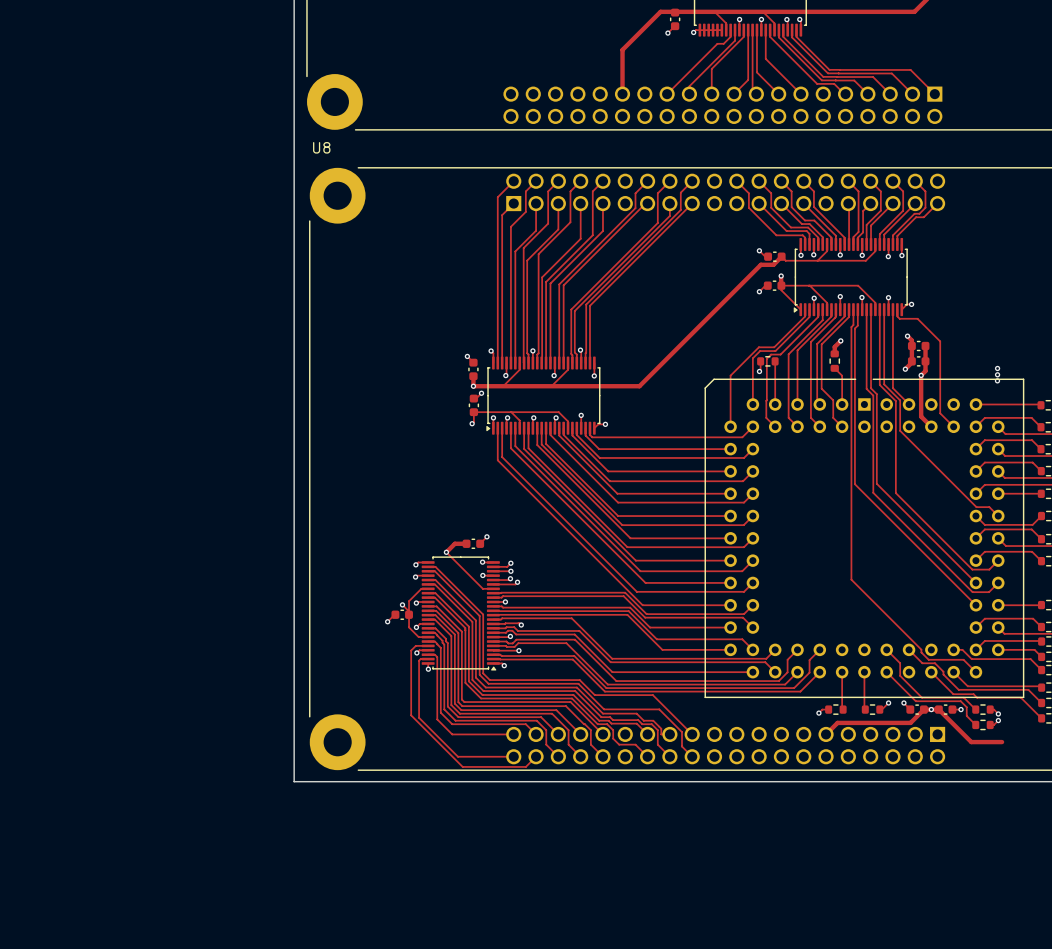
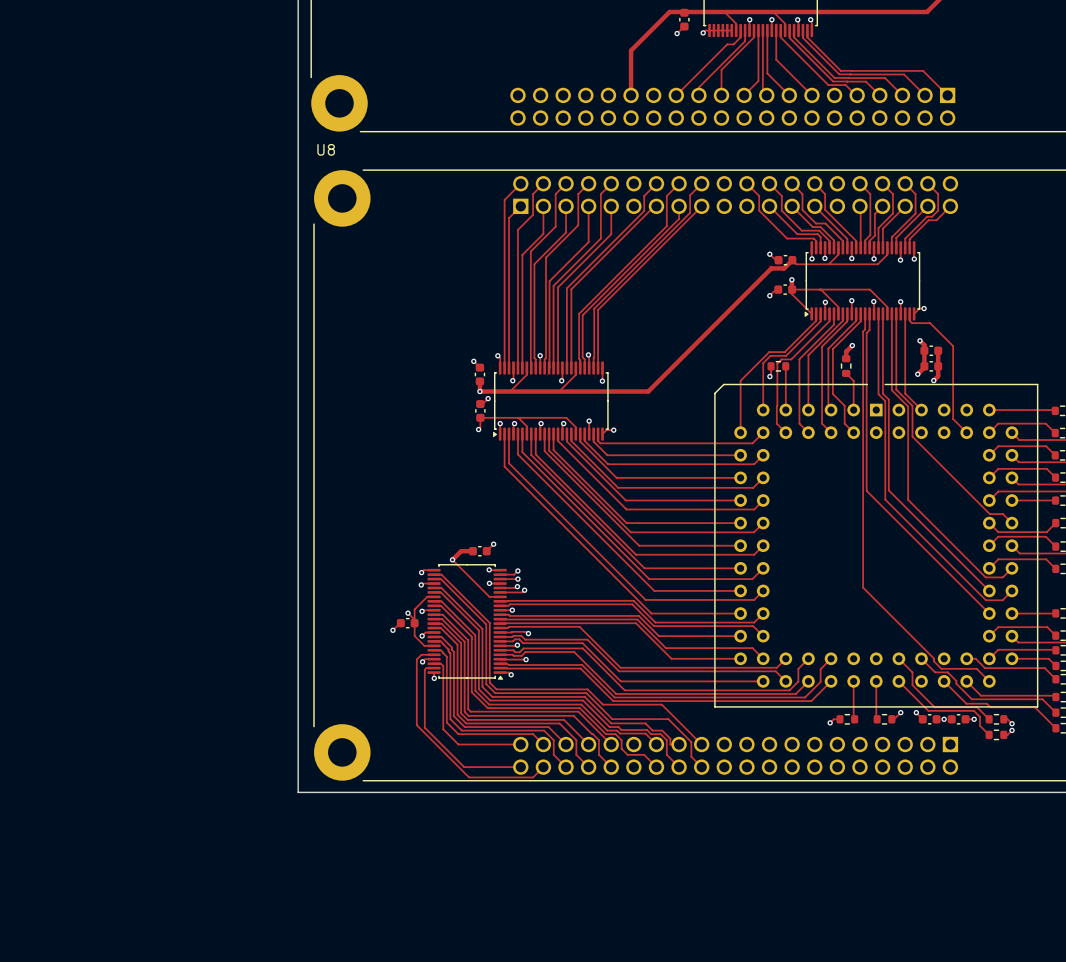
via: (997, 368) -> none
via: (997, 374) -> none
track: (921, 375) (921, 416) (931, 426) -> none
via: (997, 380) -> none
track: (826, 734) (837, 722) (910, 722) (923, 709) (938, 709) (971, 742) (1002, 742) -> none

